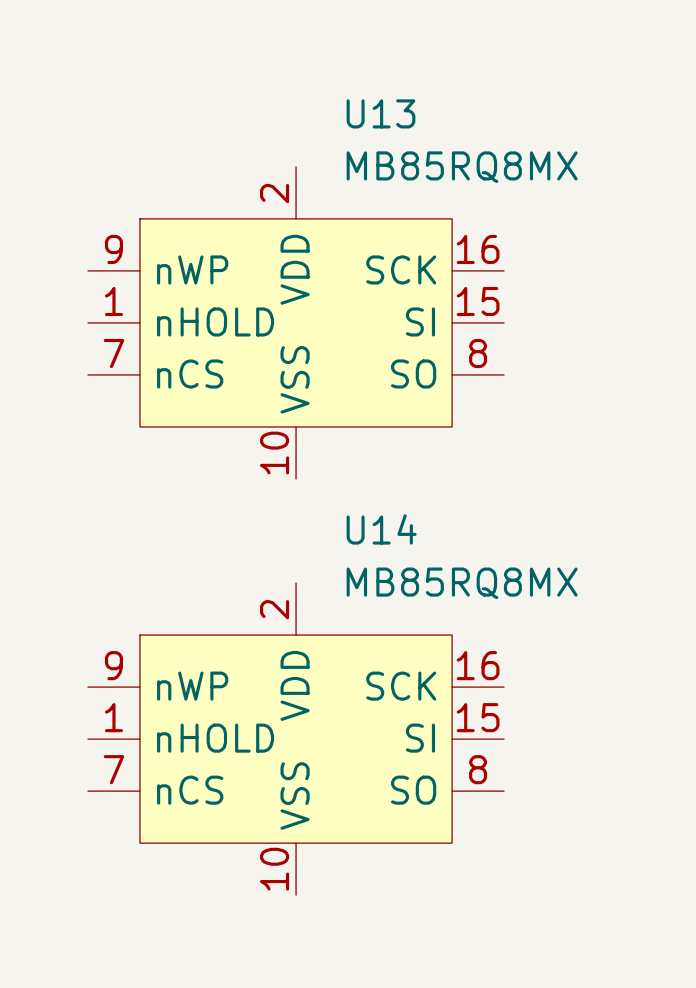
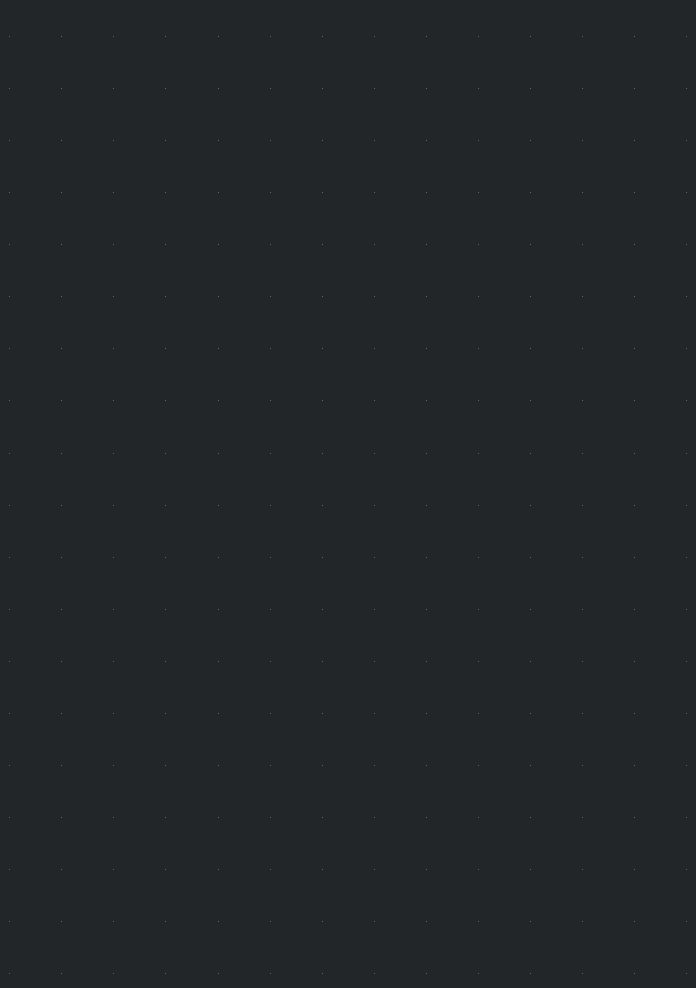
U13: MB85RQ8MX (296, 322) -> none
U14: MB85RQ8MX (296, 739) -> none

